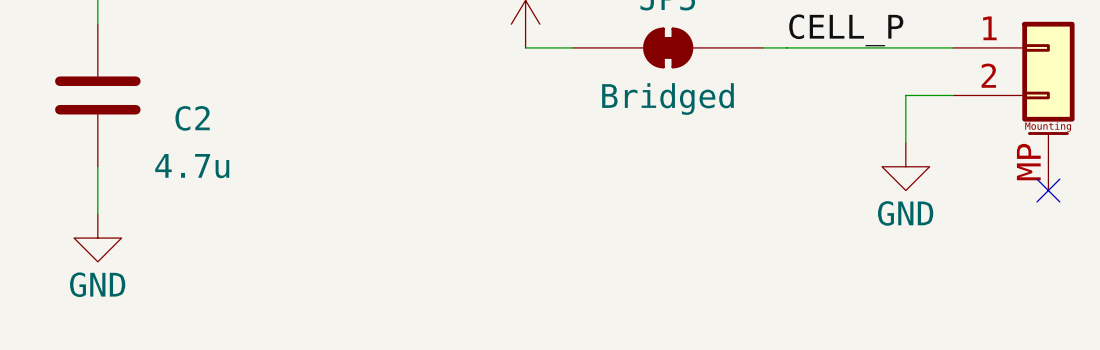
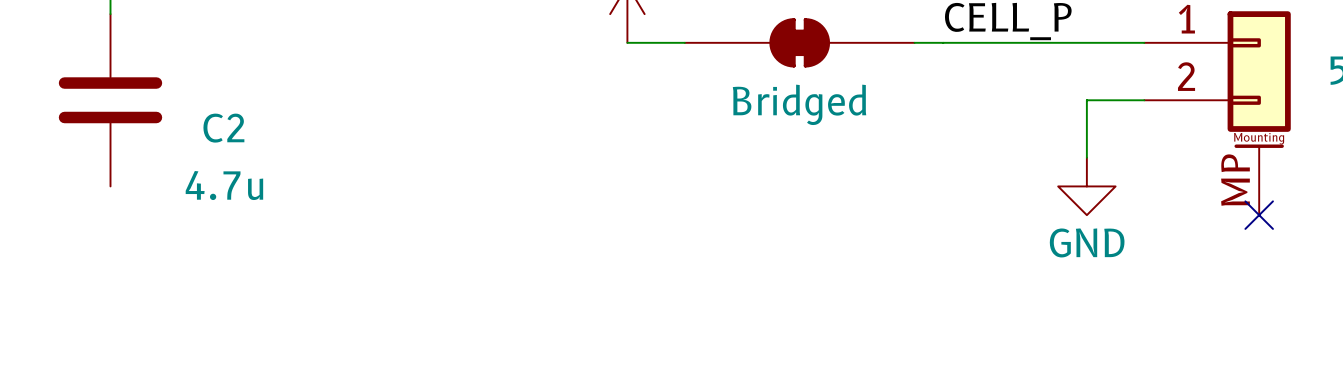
wire: (97, 166) (97, 214) -> none
power symbol: GND (97, 238) -> none

